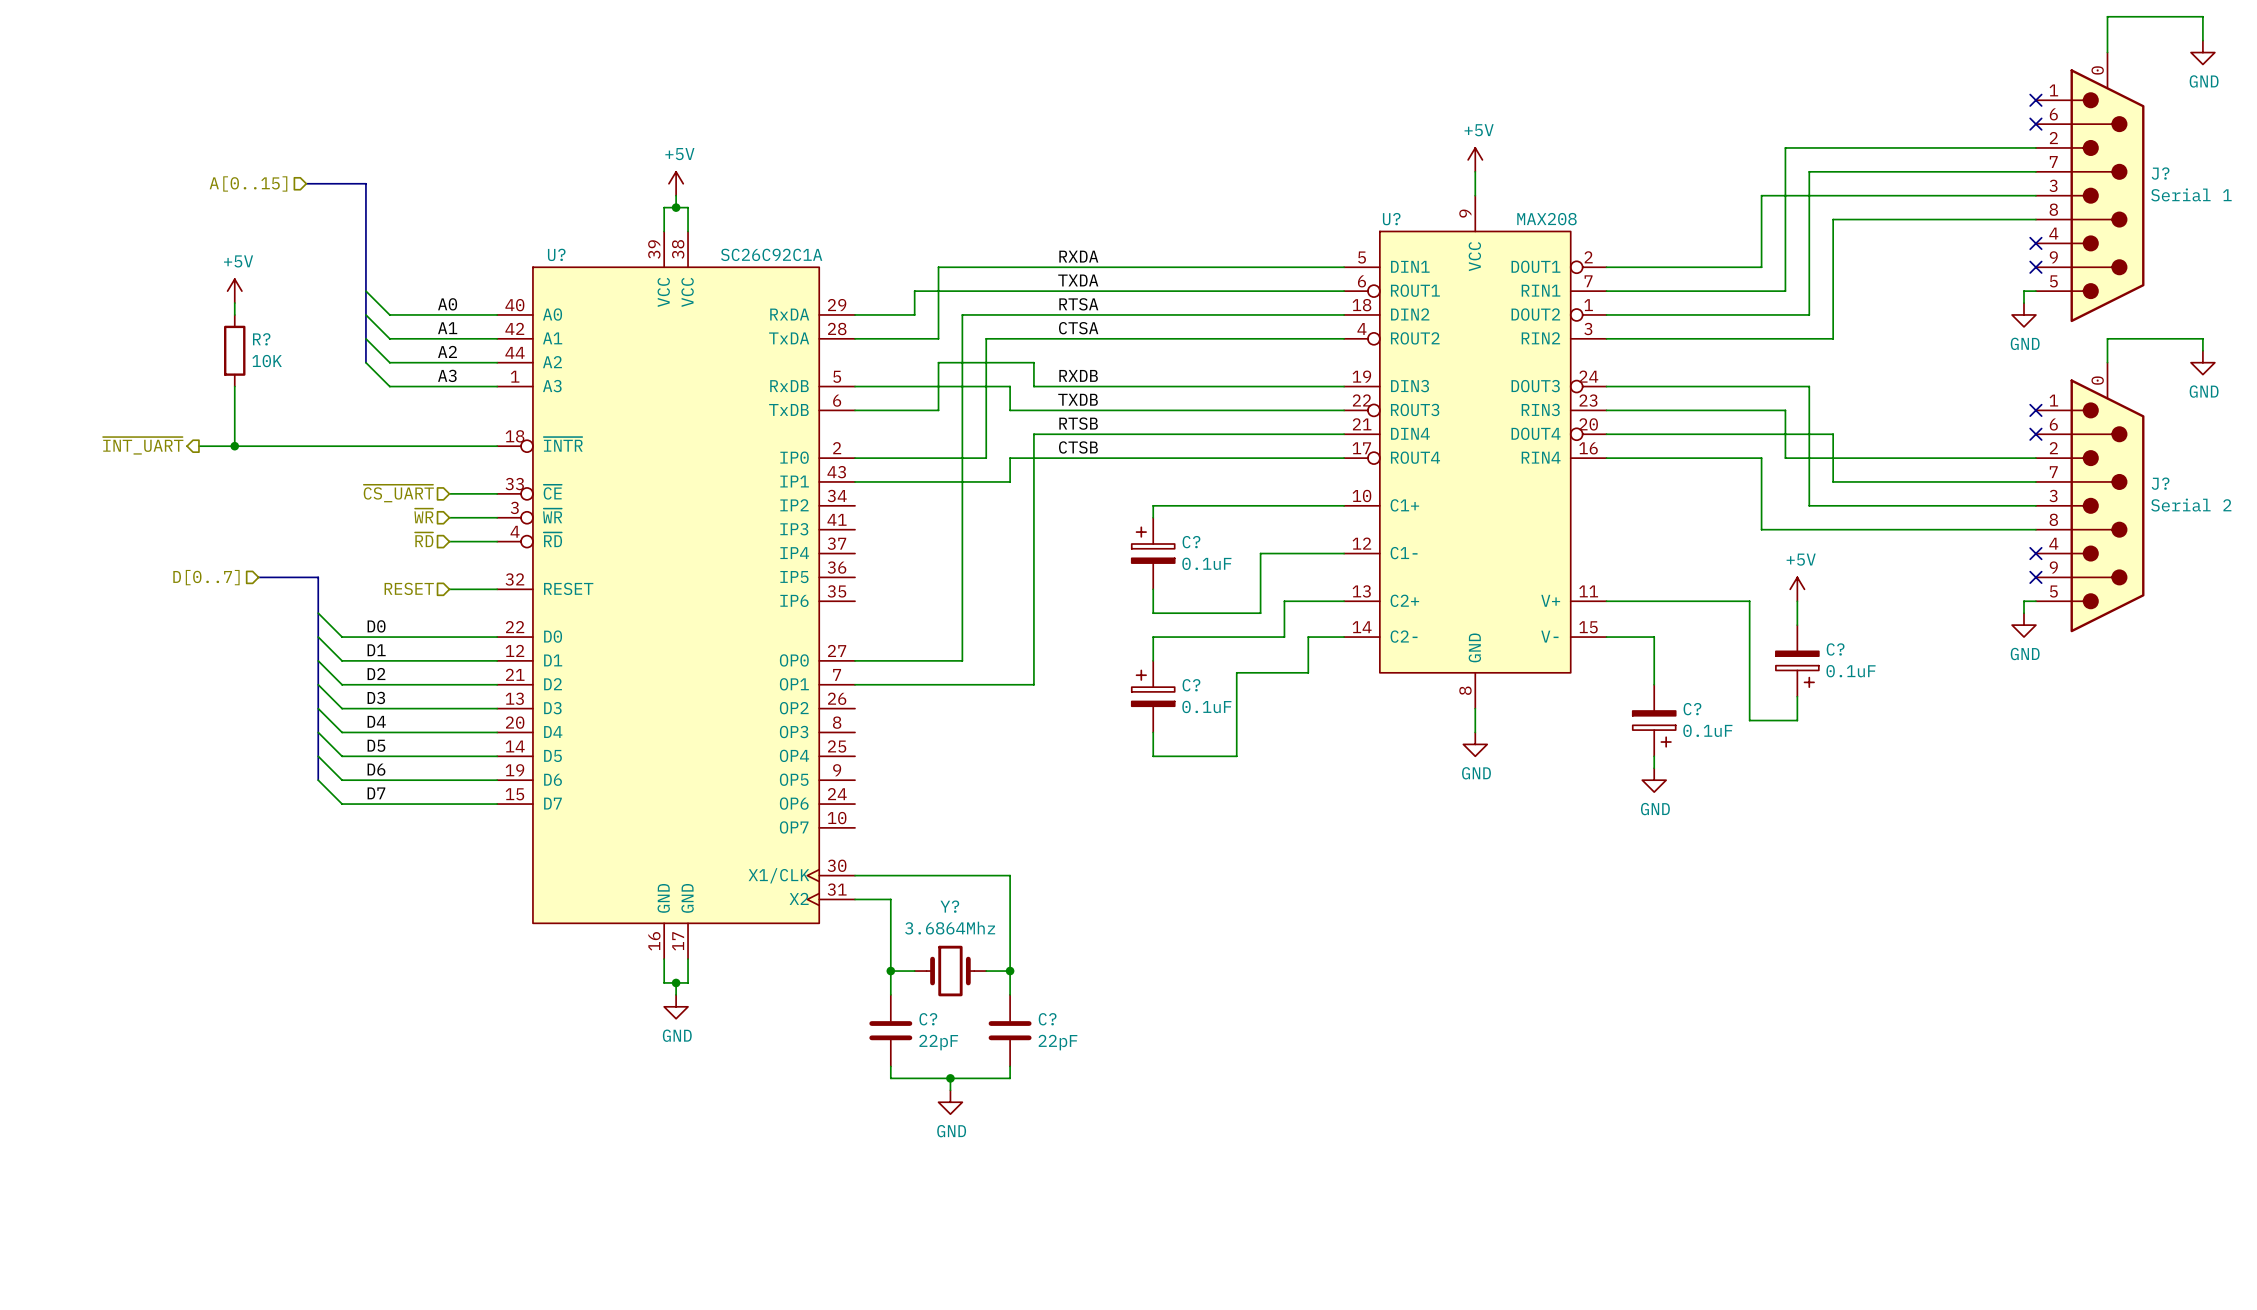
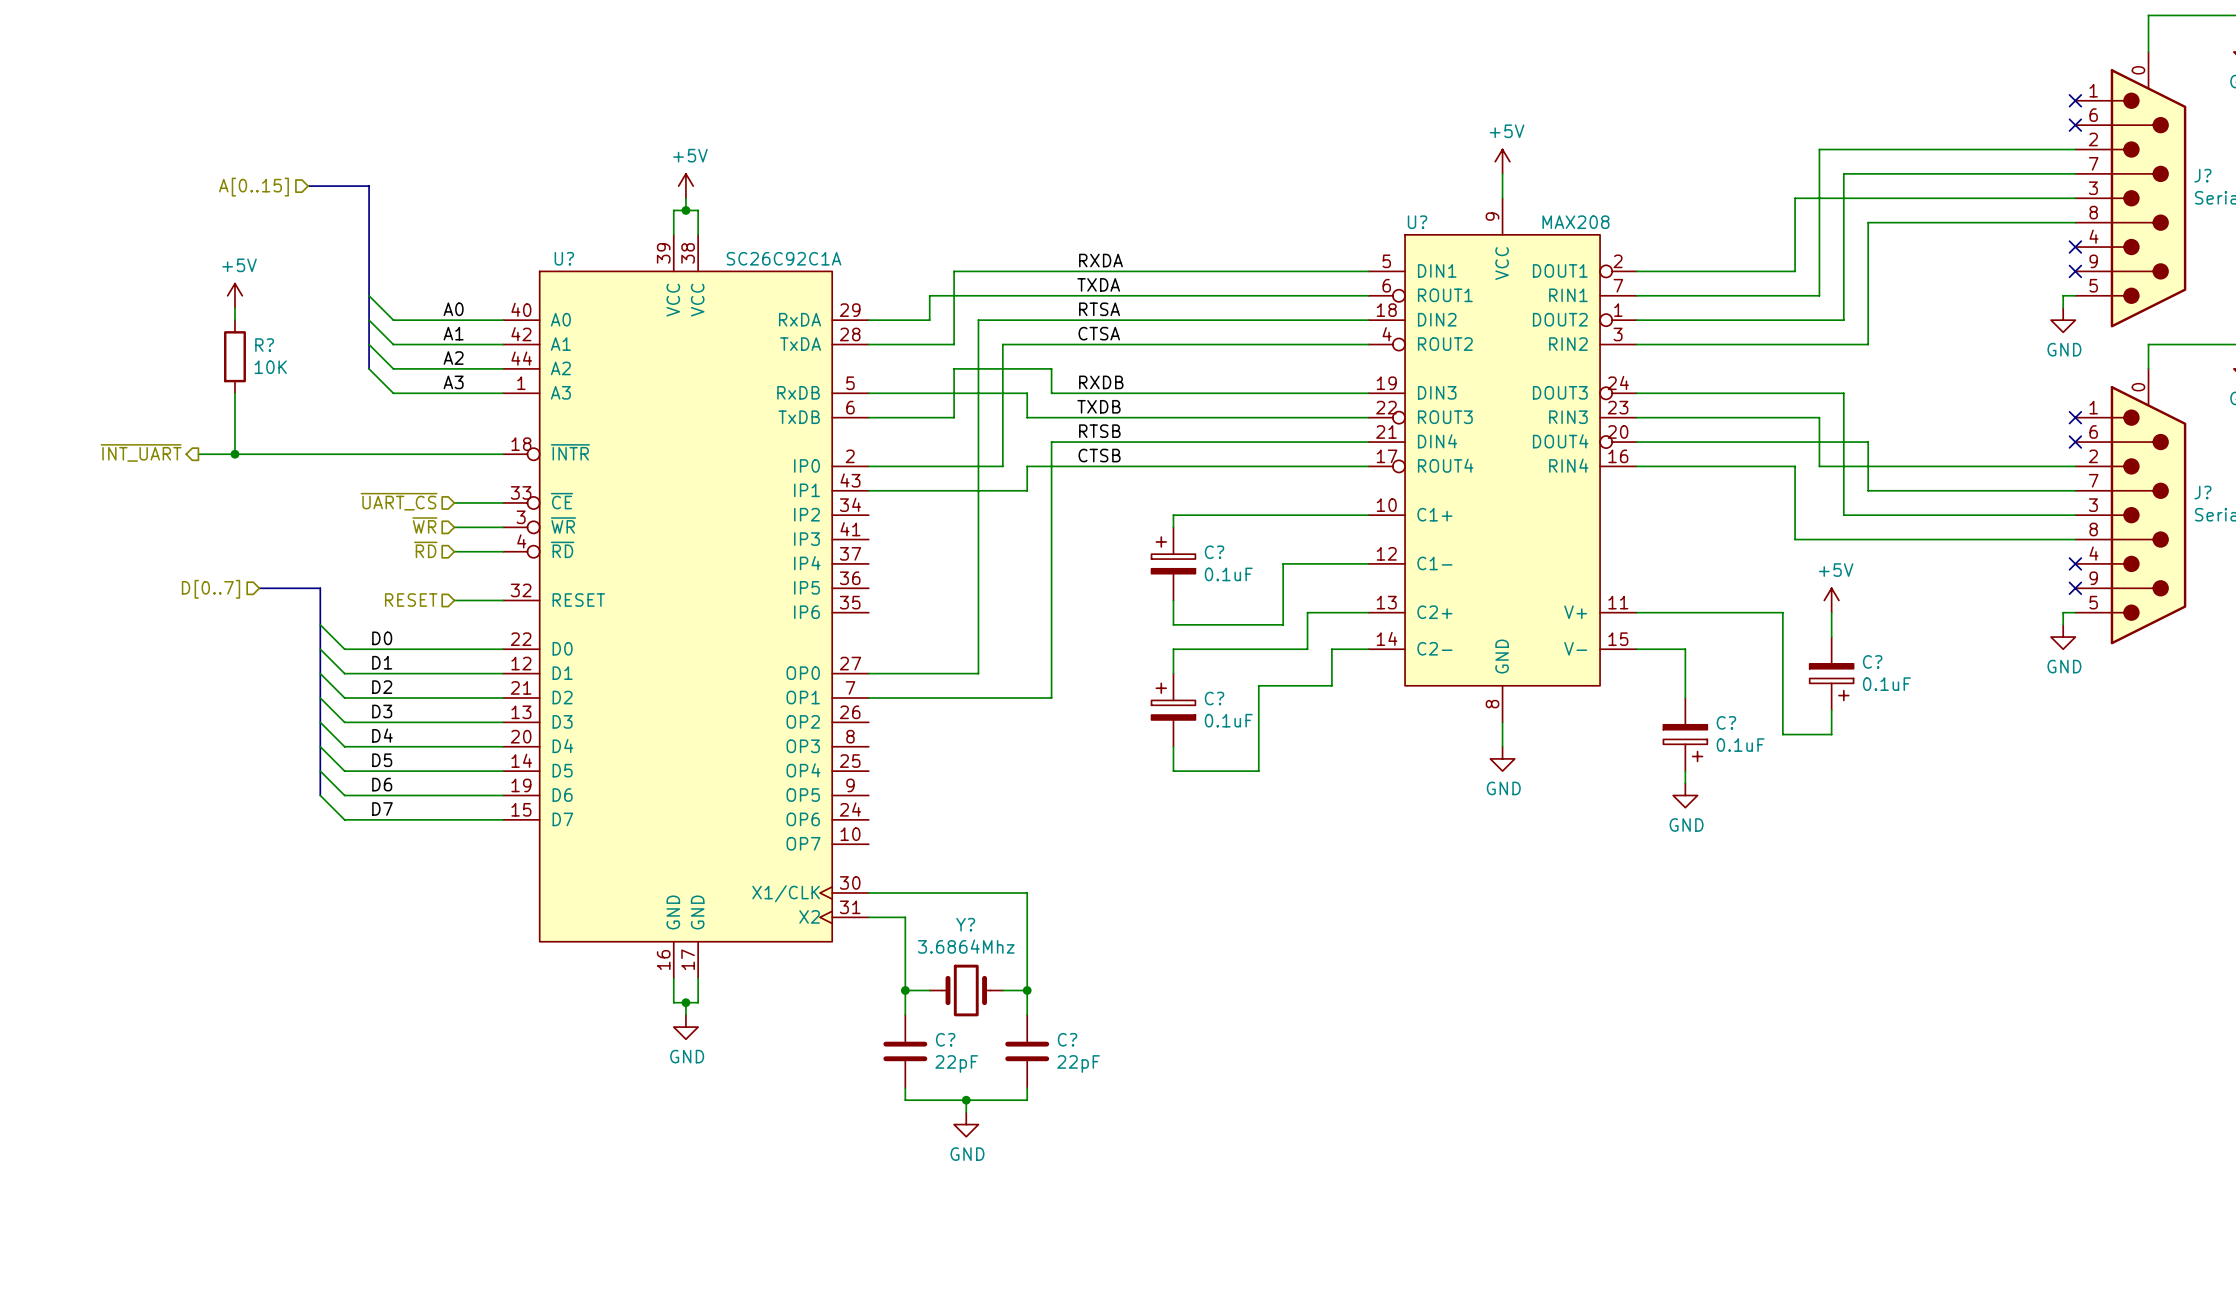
hierarchical label: ~{CS_UART} (398, 493) -> ~{UART_CS} (399, 501)

